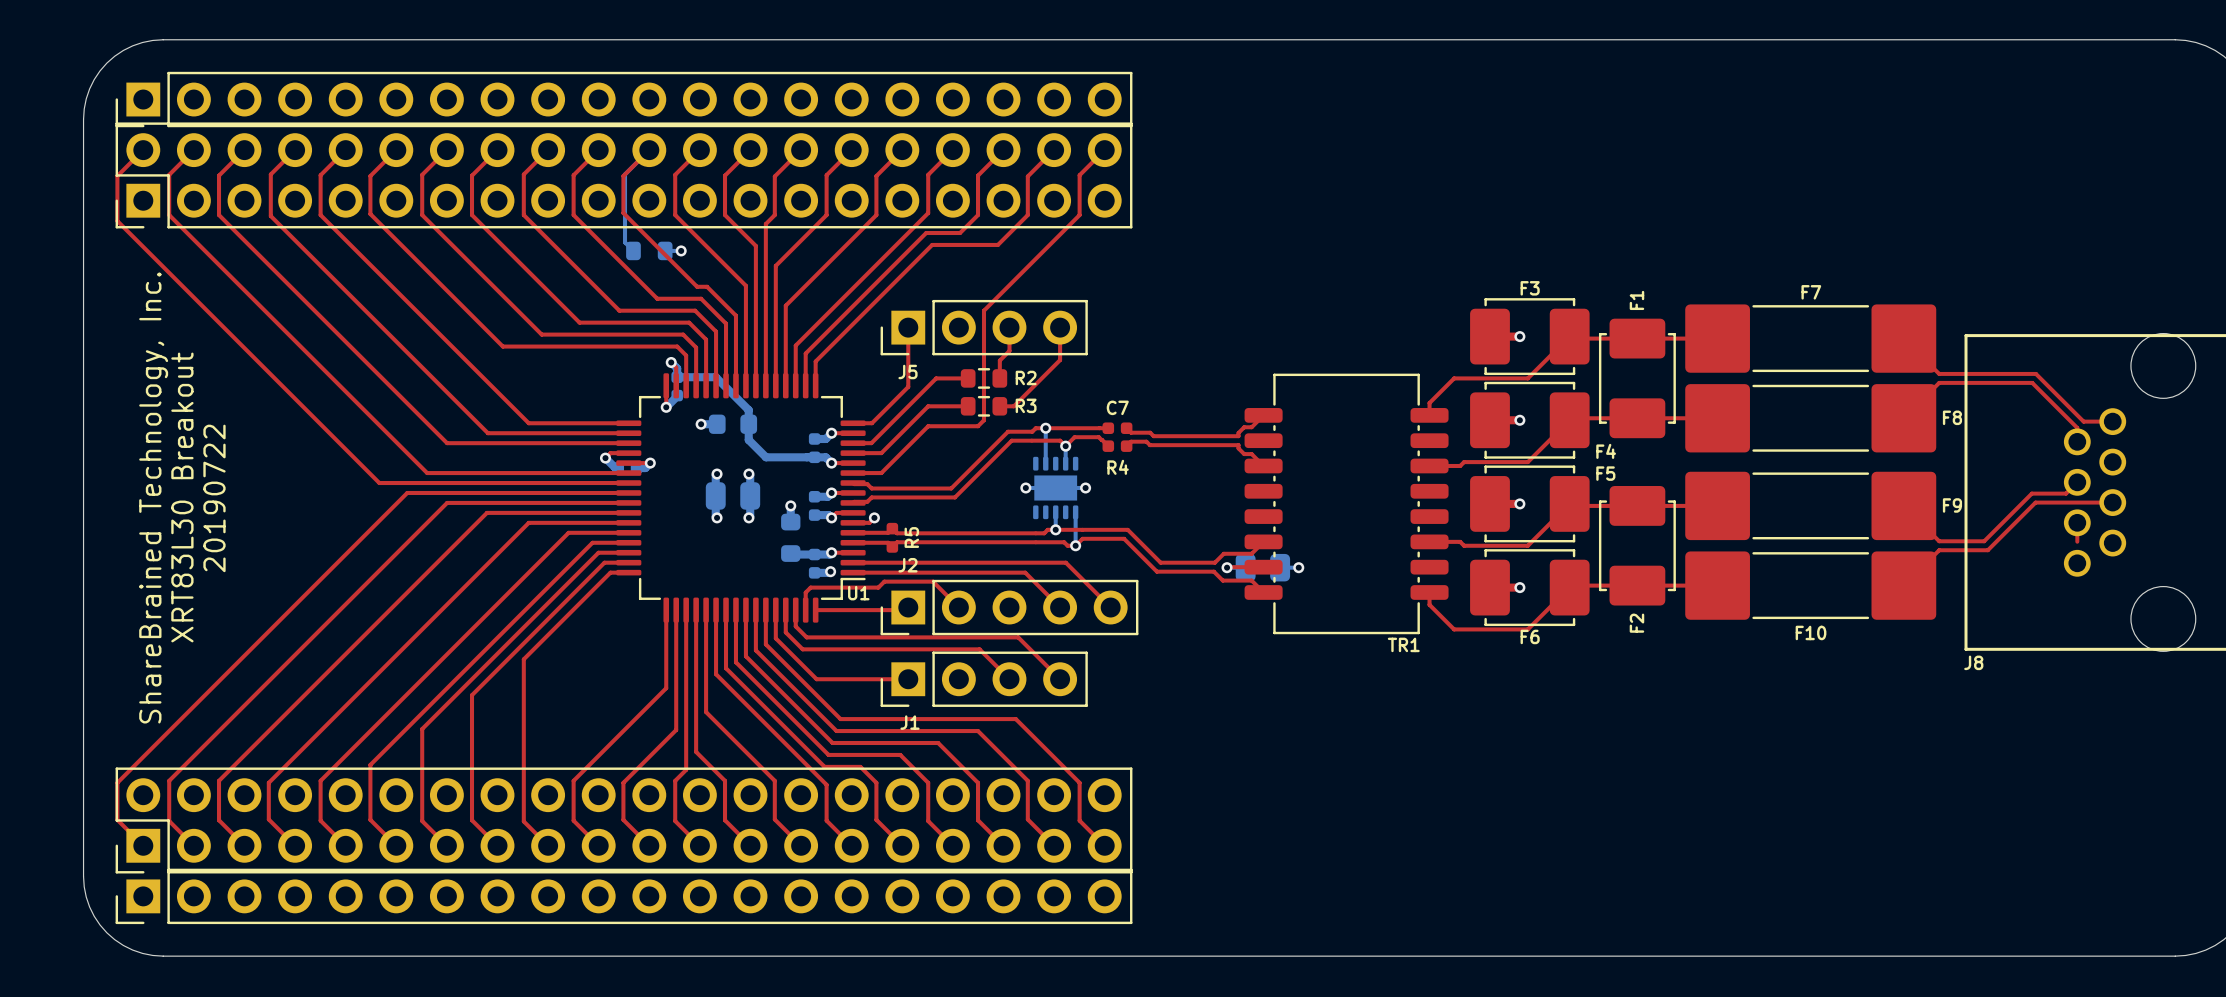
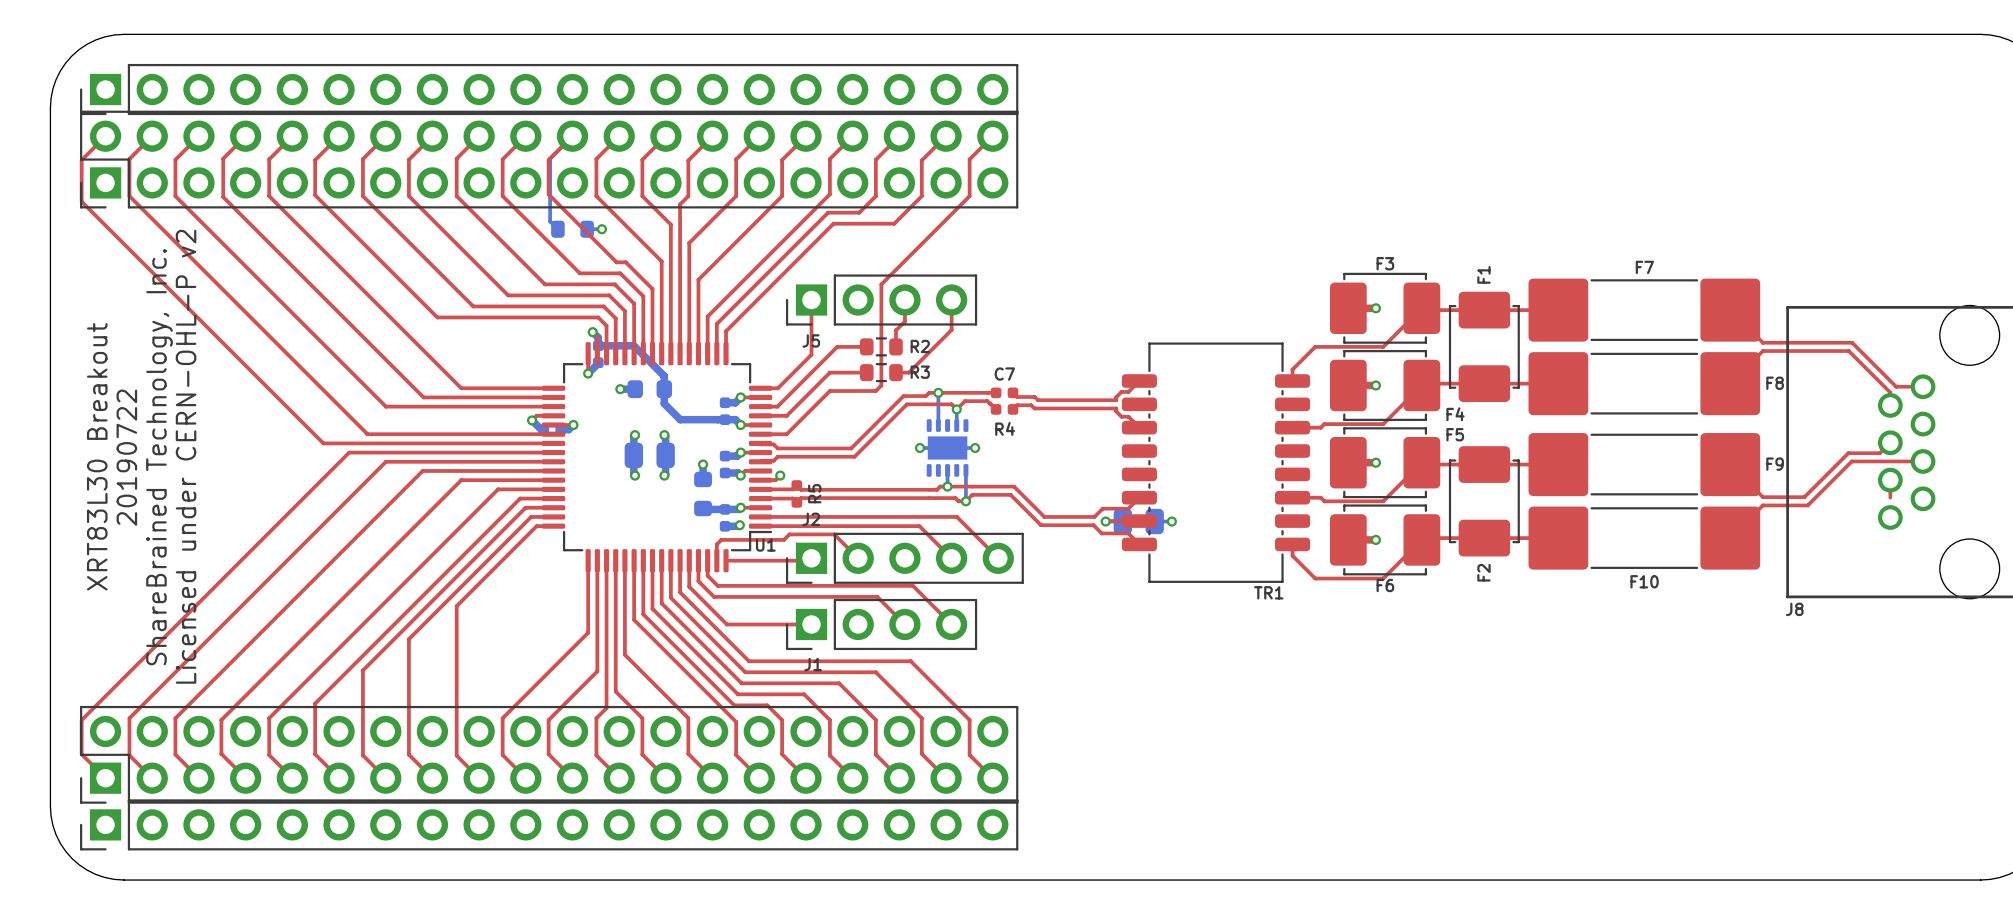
text position: ShareBrained Technology, Inc. (153, 497) -> ShareBrained Technology, Inc. (159, 457)
text position: XRT83L30 Breakout (182, 497) -> XRT83L30 Breakout (97, 456)
text: none -> Licensed under CERN-OHL-P v2 (186, 456)
text position: 20190722 (214, 498) -> 20190722 (126, 457)

